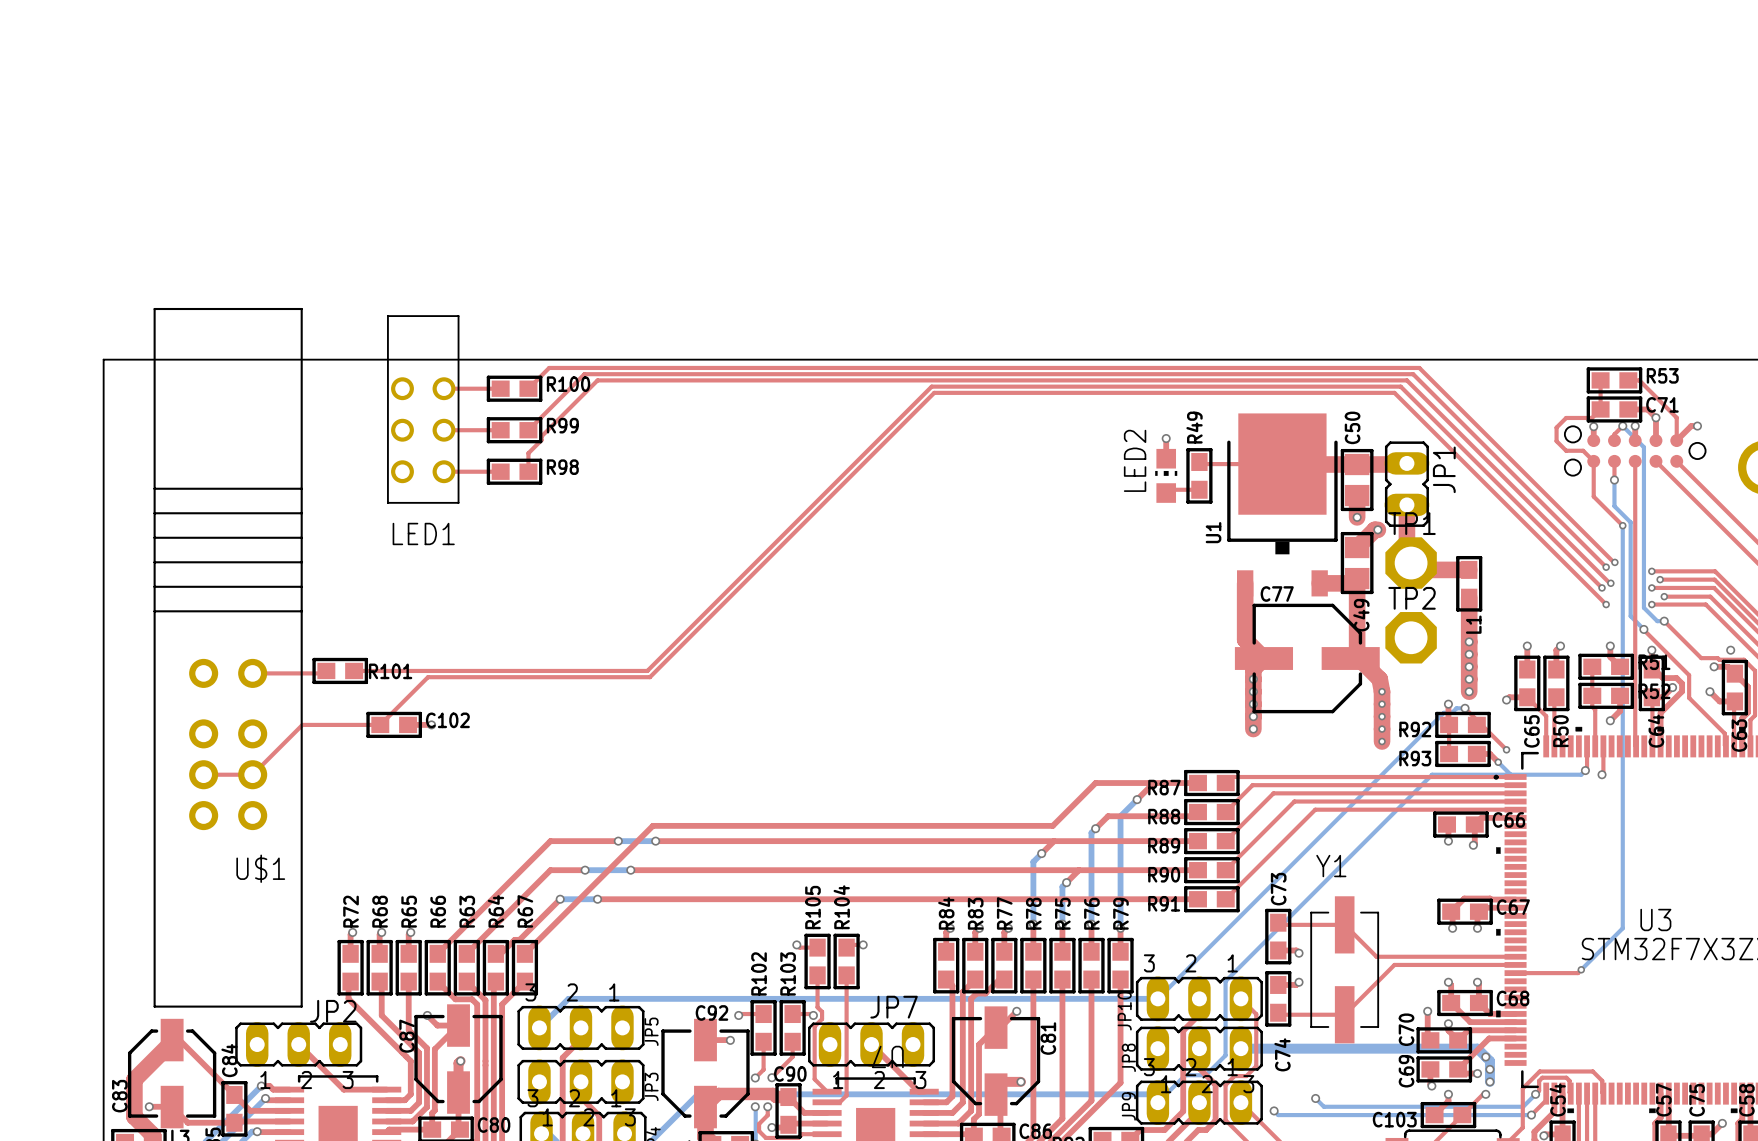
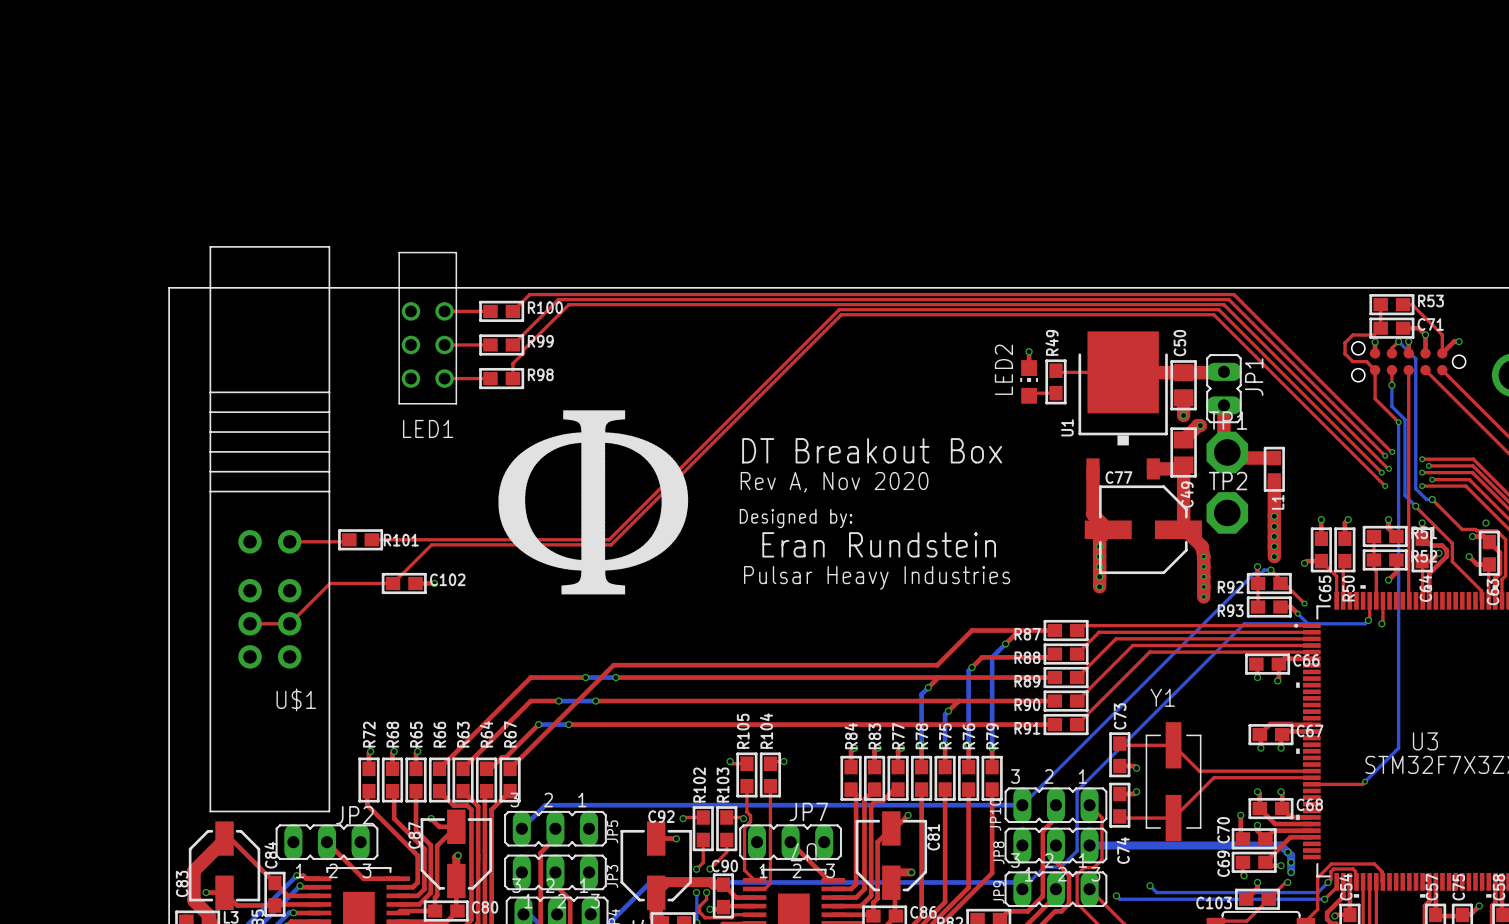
drawing: none -> [498, 410, 689, 595]
text: none -> DT Breakout Box (872, 450)
text: none -> Rev A, Nov 2020 (834, 482)
text: none -> Designed by: (796, 518)
text: none -> Eran Rundstein (879, 544)
text: none -> Pulsar Heavy Industries (877, 577)

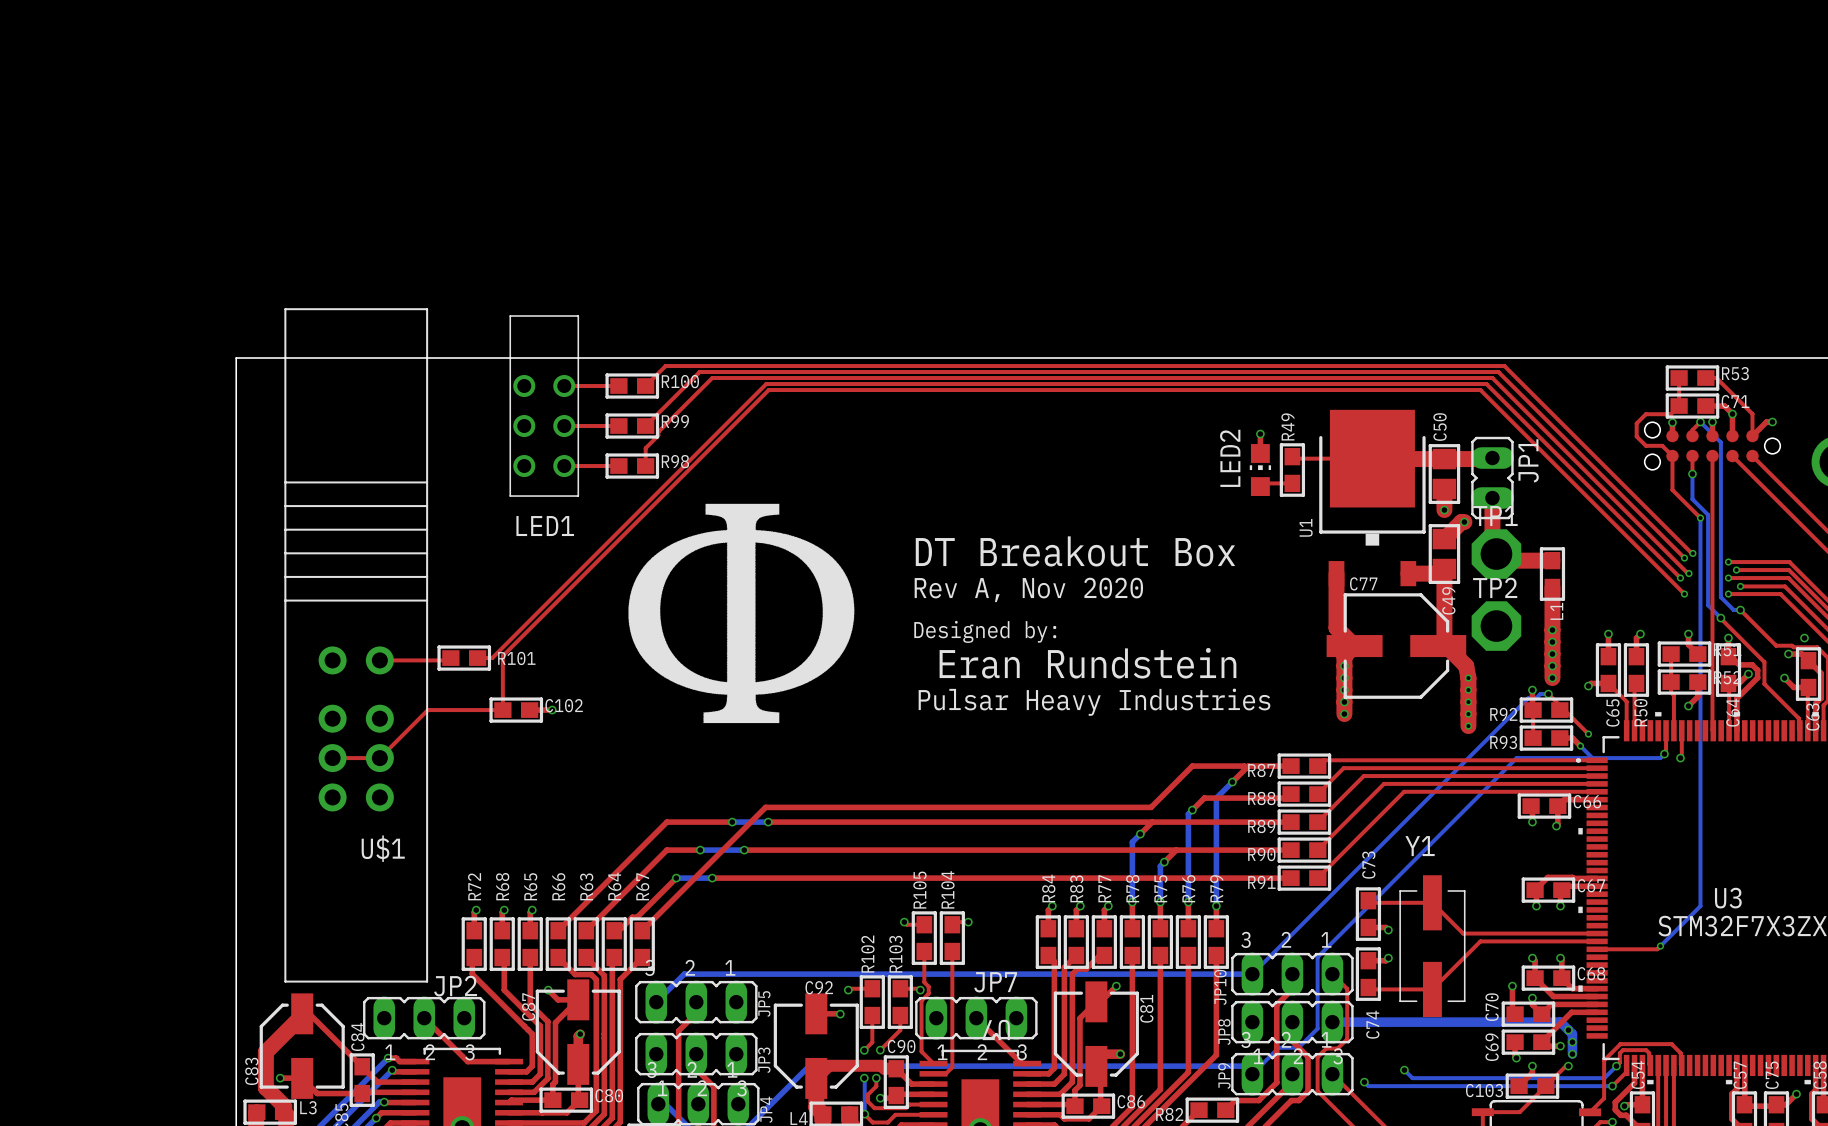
top track: (839, 309) (609, 539) (384, 539) -> (1034, 384) (766, 384) (492, 658)
top track: (841, 314) (611, 544) (431, 544) (393, 583) -> (1036, 390) (768, 390) (502, 655) (502, 710)

